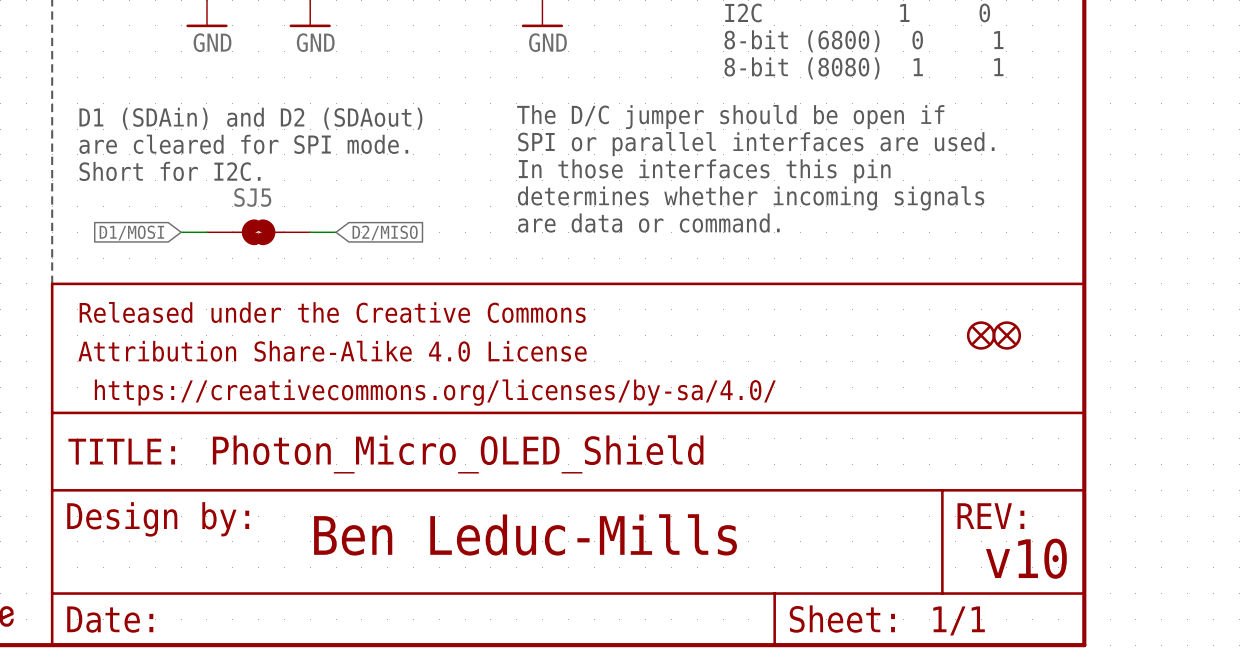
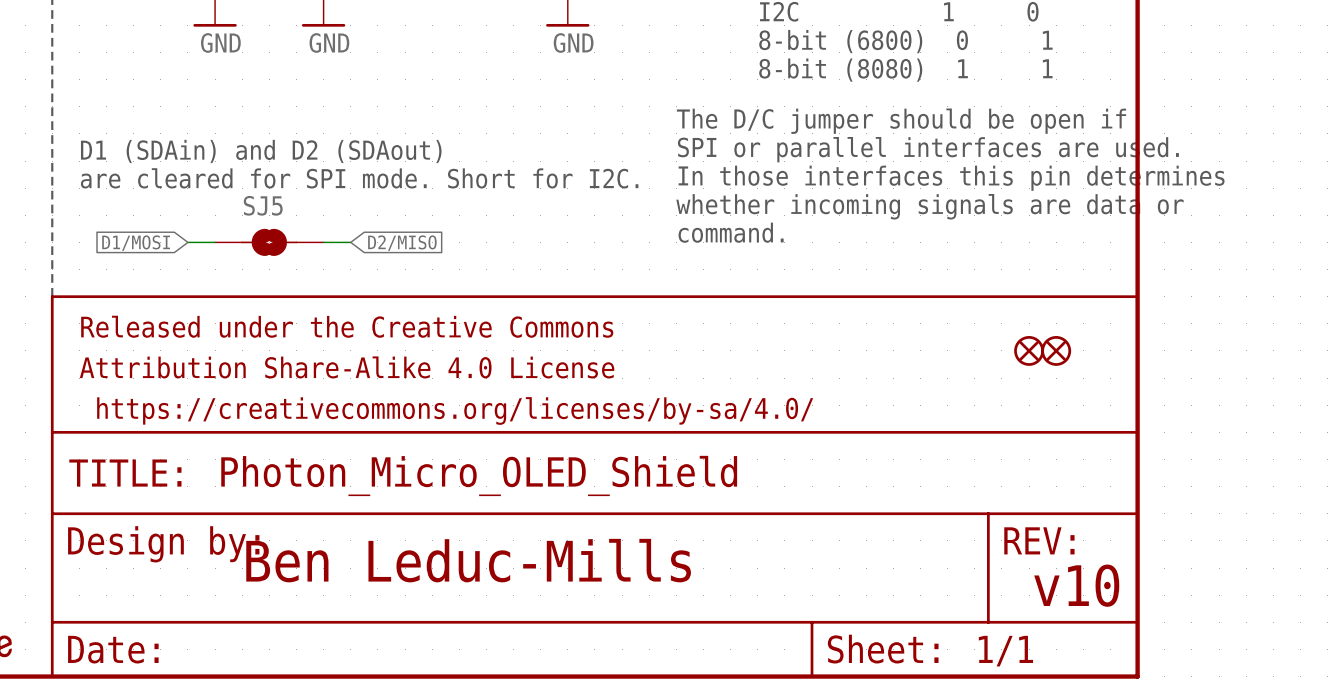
text position: The D/C jumper should be open if (730, 117) -> The D/C jumper should be open if (901, 121)
text: D1 (SDAin) and D2 (SDAout) (250, 118) -> none
text: are cleared for SPI mode. (243, 144) -> D1 (SDAin) and D2 (SDAout) (261, 151)
text position: SPI or parallel interfaces are used. (756, 144) -> SPI or parallel interfaces are used. (928, 149)
text: Short for I2C. (170, 171) -> are cleared for SPI mode. Short for I2C. (359, 178)
text: In those interfaces this pin (704, 171) -> In those interfaces this pin determines (951, 178)
text: determines whether incoming signals (751, 198) -> whether incoming signals are data or (929, 206)
text: are data or command. (648, 223) -> none
text: none -> command. (731, 232)
text position: Ben Leduc-Mills (525, 534) -> Ben Leduc-Mills (468, 560)

